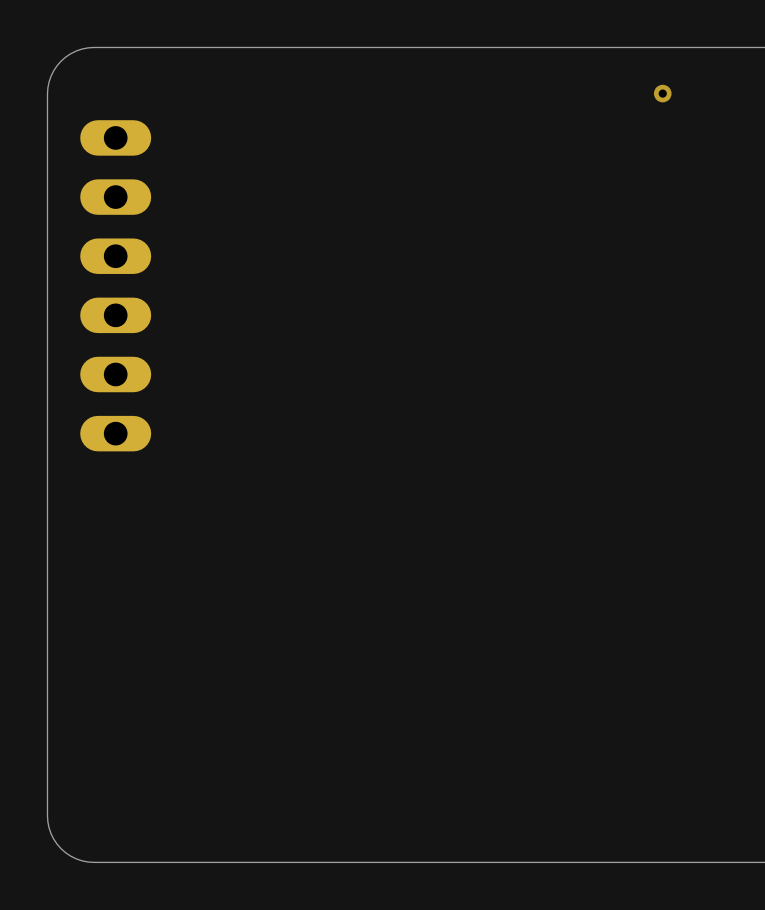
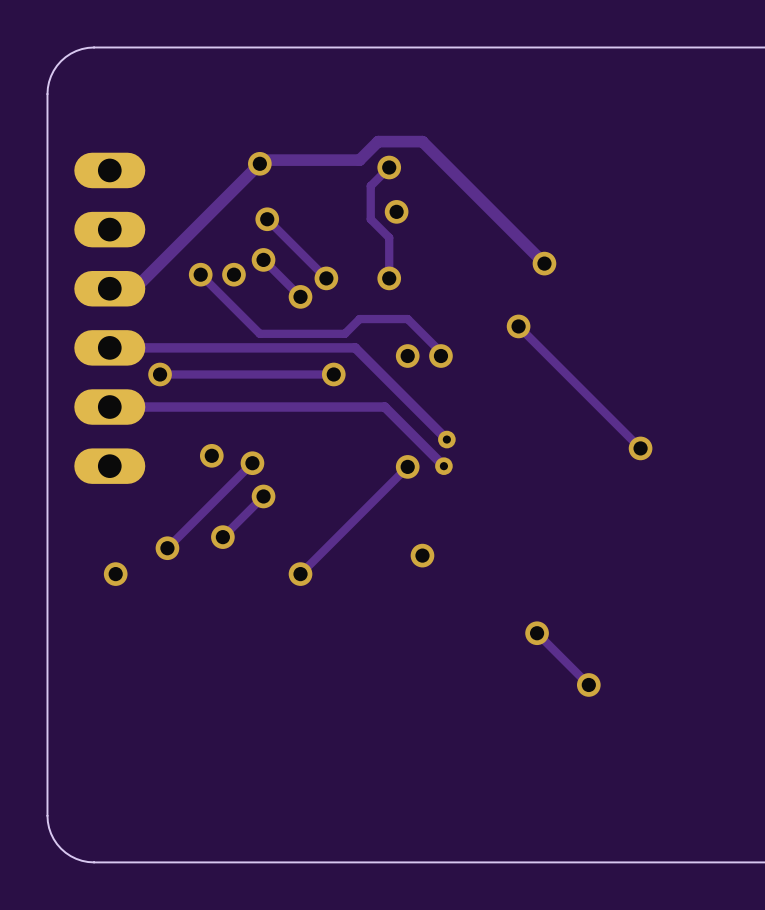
via: (662, 93) -> none
via: none -> (259, 163)
track: none -> (389, 167) (370, 185) (370, 219) (389, 237) (389, 278)
via: none -> (389, 167)
via: none -> (396, 211)
track: none -> (267, 219) (326, 278)
via: none -> (267, 219)
track: none -> (263, 259) (300, 296)
via: none -> (263, 259)
track: none -> (544, 263) (422, 141) (378, 141) (359, 160) (263, 160) (137, 285) (112, 285) (109, 288)
via: none -> (544, 263)
track: none -> (200, 274) (259, 333) (344, 333) (359, 319) (407, 319) (440, 352) (440, 356)
via: none -> (200, 274)
via: none -> (233, 274)
via: none -> (326, 278)
via: none -> (389, 278)
part position: (115, 285) -> (109, 318)
via: none -> (300, 296)
track: none -> (518, 326) (640, 448)
via: none -> (518, 326)
track: none -> (109, 347) (355, 347) (446, 439)
via: none -> (407, 356)
via: none -> (440, 356)
via: none -> (160, 374)
track: none -> (333, 374) (160, 374)
via: none -> (333, 374)
track: none -> (109, 407) (384, 407) (443, 466)
via: none -> (446, 439)
via: none -> (640, 448)
via: none -> (211, 455)
track: none -> (252, 463) (167, 548)
via: none -> (252, 463)
track: none -> (407, 466) (300, 574)
via: none -> (407, 466)
via: none -> (443, 466)
track: none -> (263, 496) (222, 537)
via: none -> (263, 496)
via: none -> (222, 537)
via: none -> (167, 548)
via: none -> (422, 555)
via: none -> (115, 574)
via: none -> (300, 574)
track: none -> (537, 633) (588, 684)
via: none -> (537, 633)
via: none -> (588, 684)

